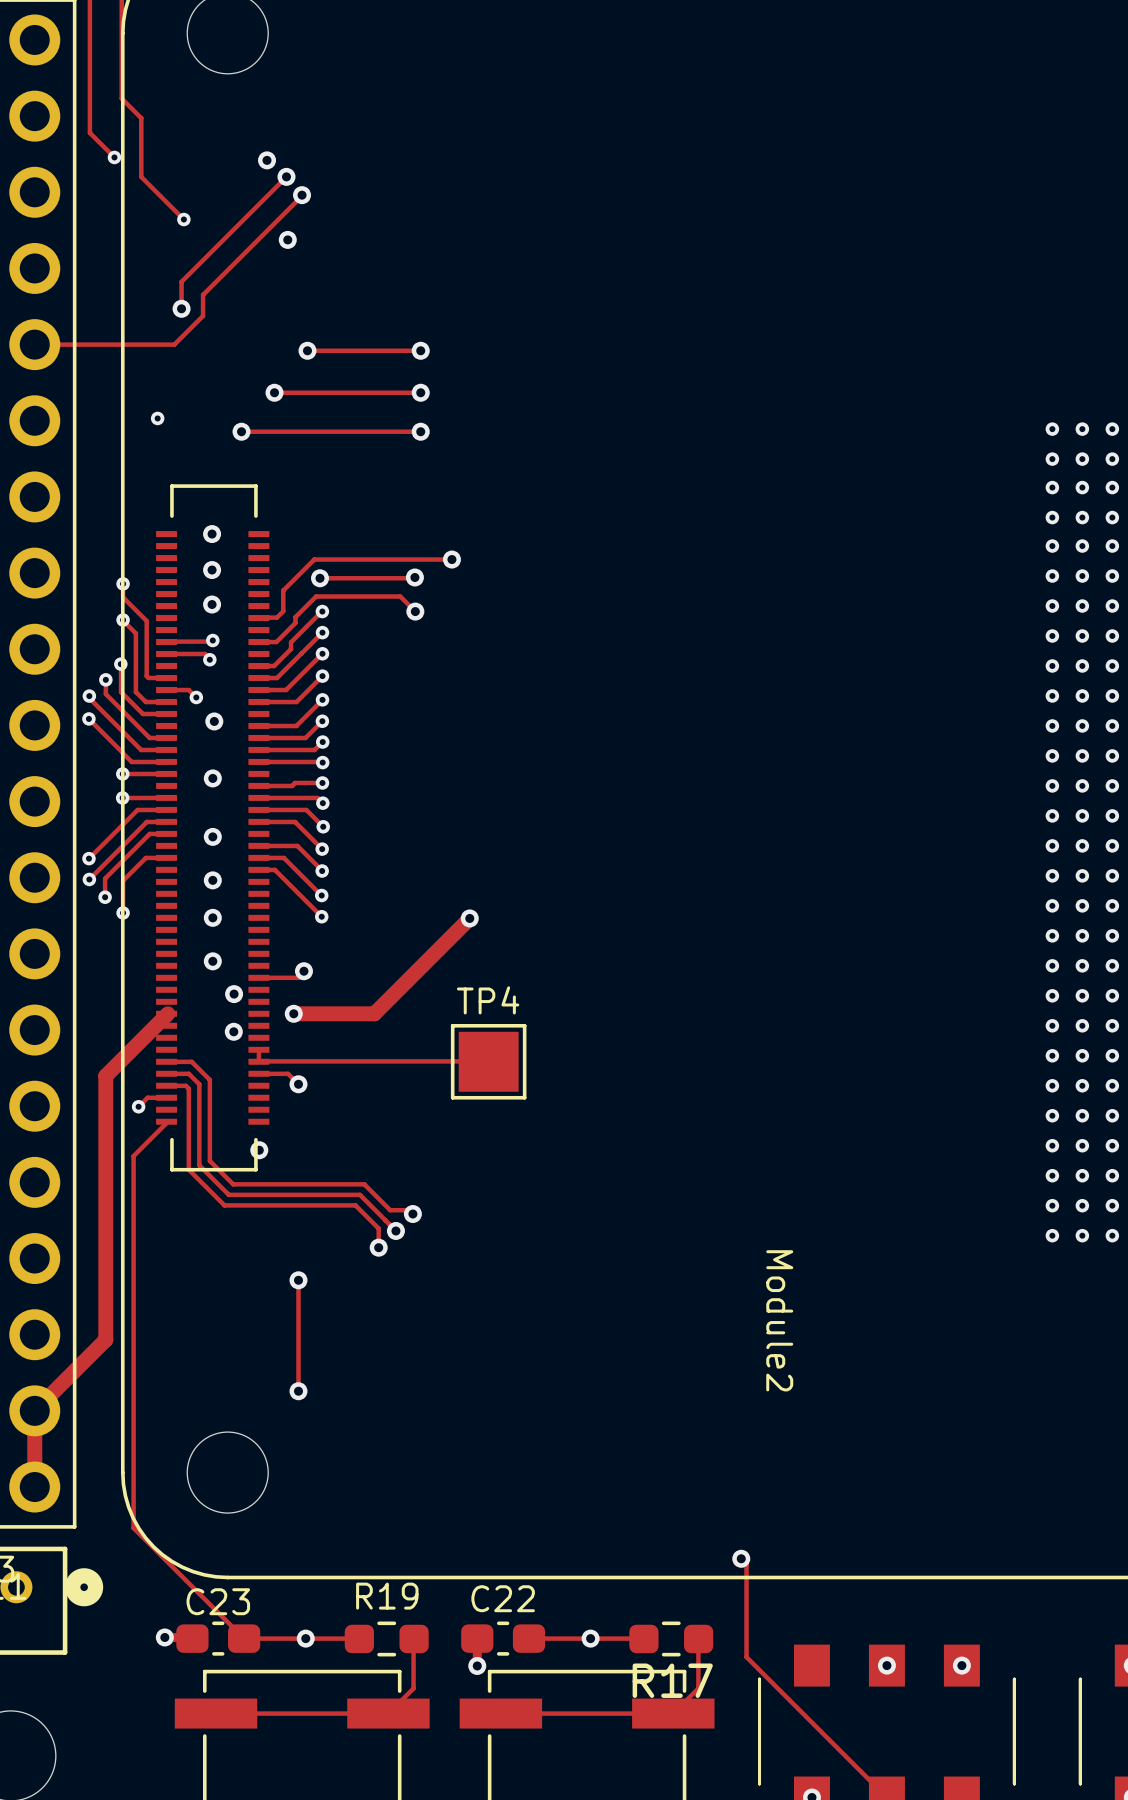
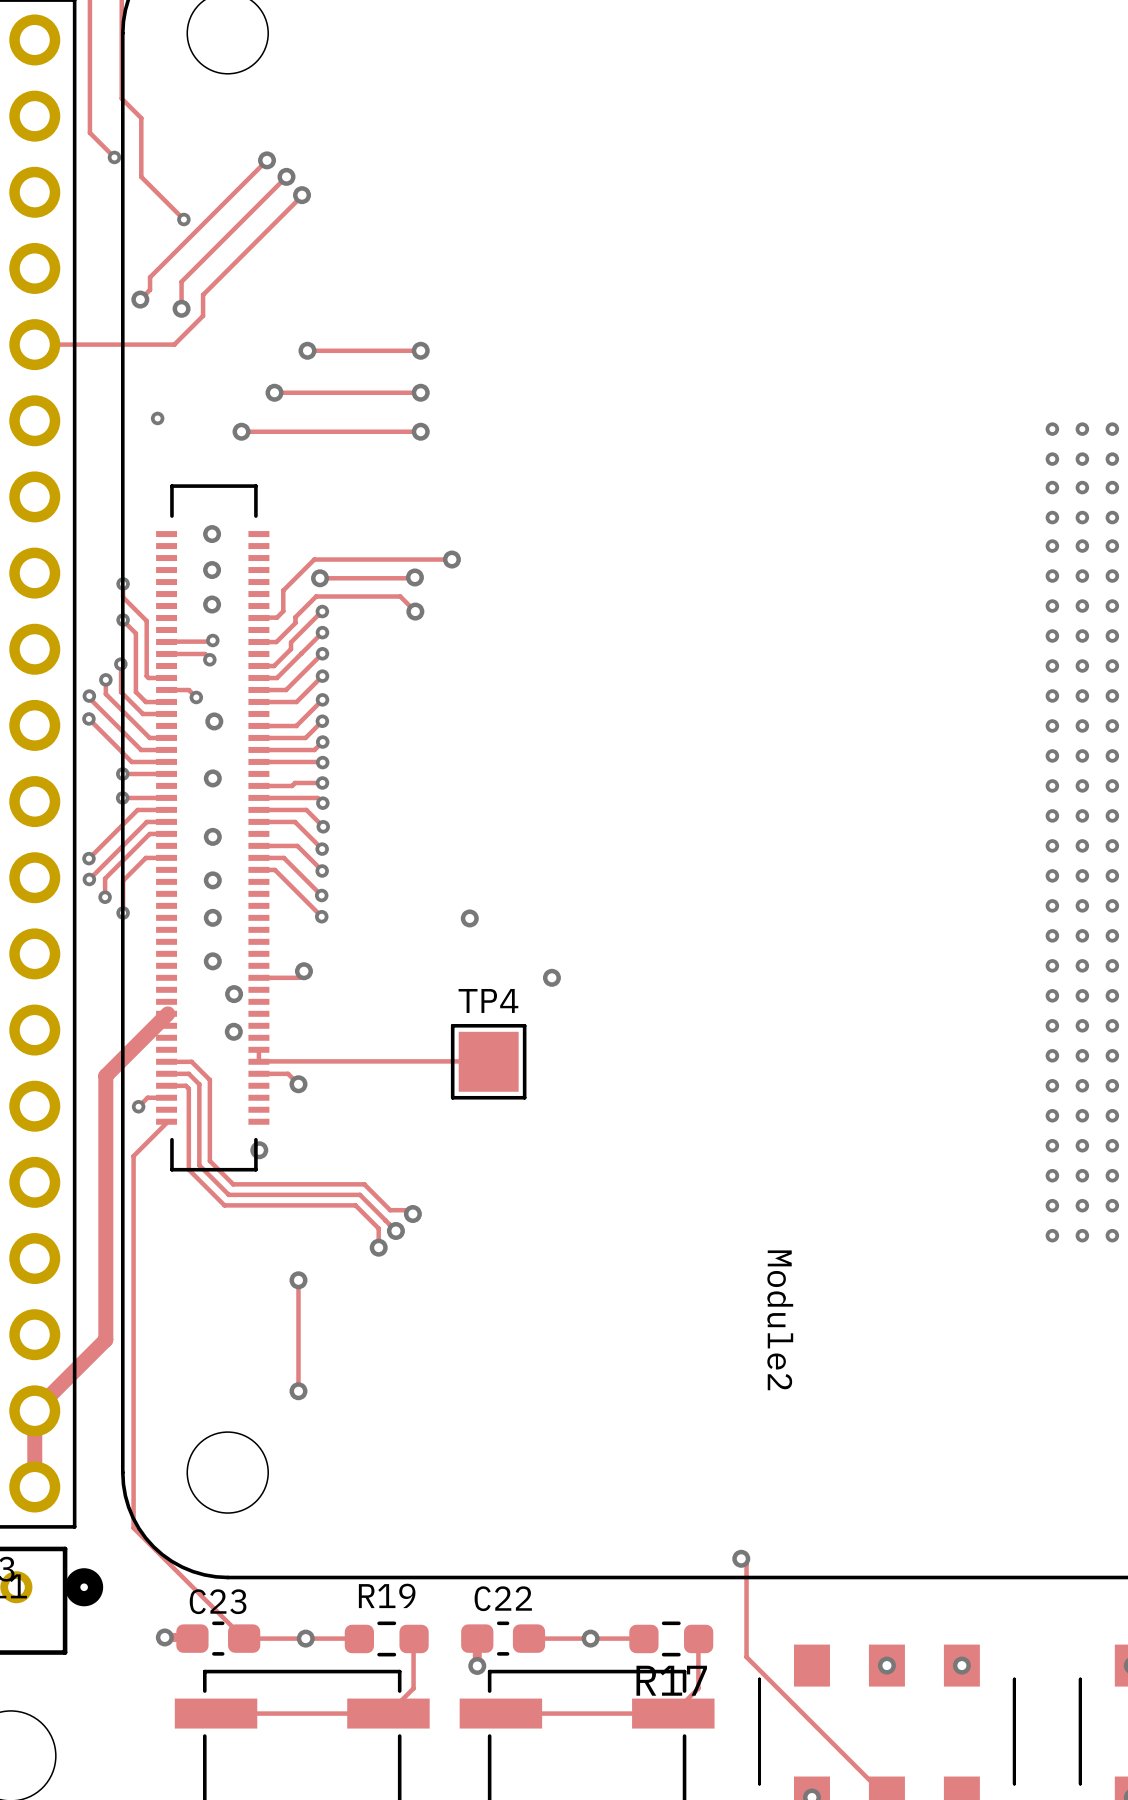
track: none -> (267, 160) (150, 277) (150, 289) (140, 299)
via position: (287, 239) -> (140, 299)
track: (469, 918) (374, 1013) (293, 1013) -> none
via: none -> (551, 977)
via: (293, 1013) -> none

